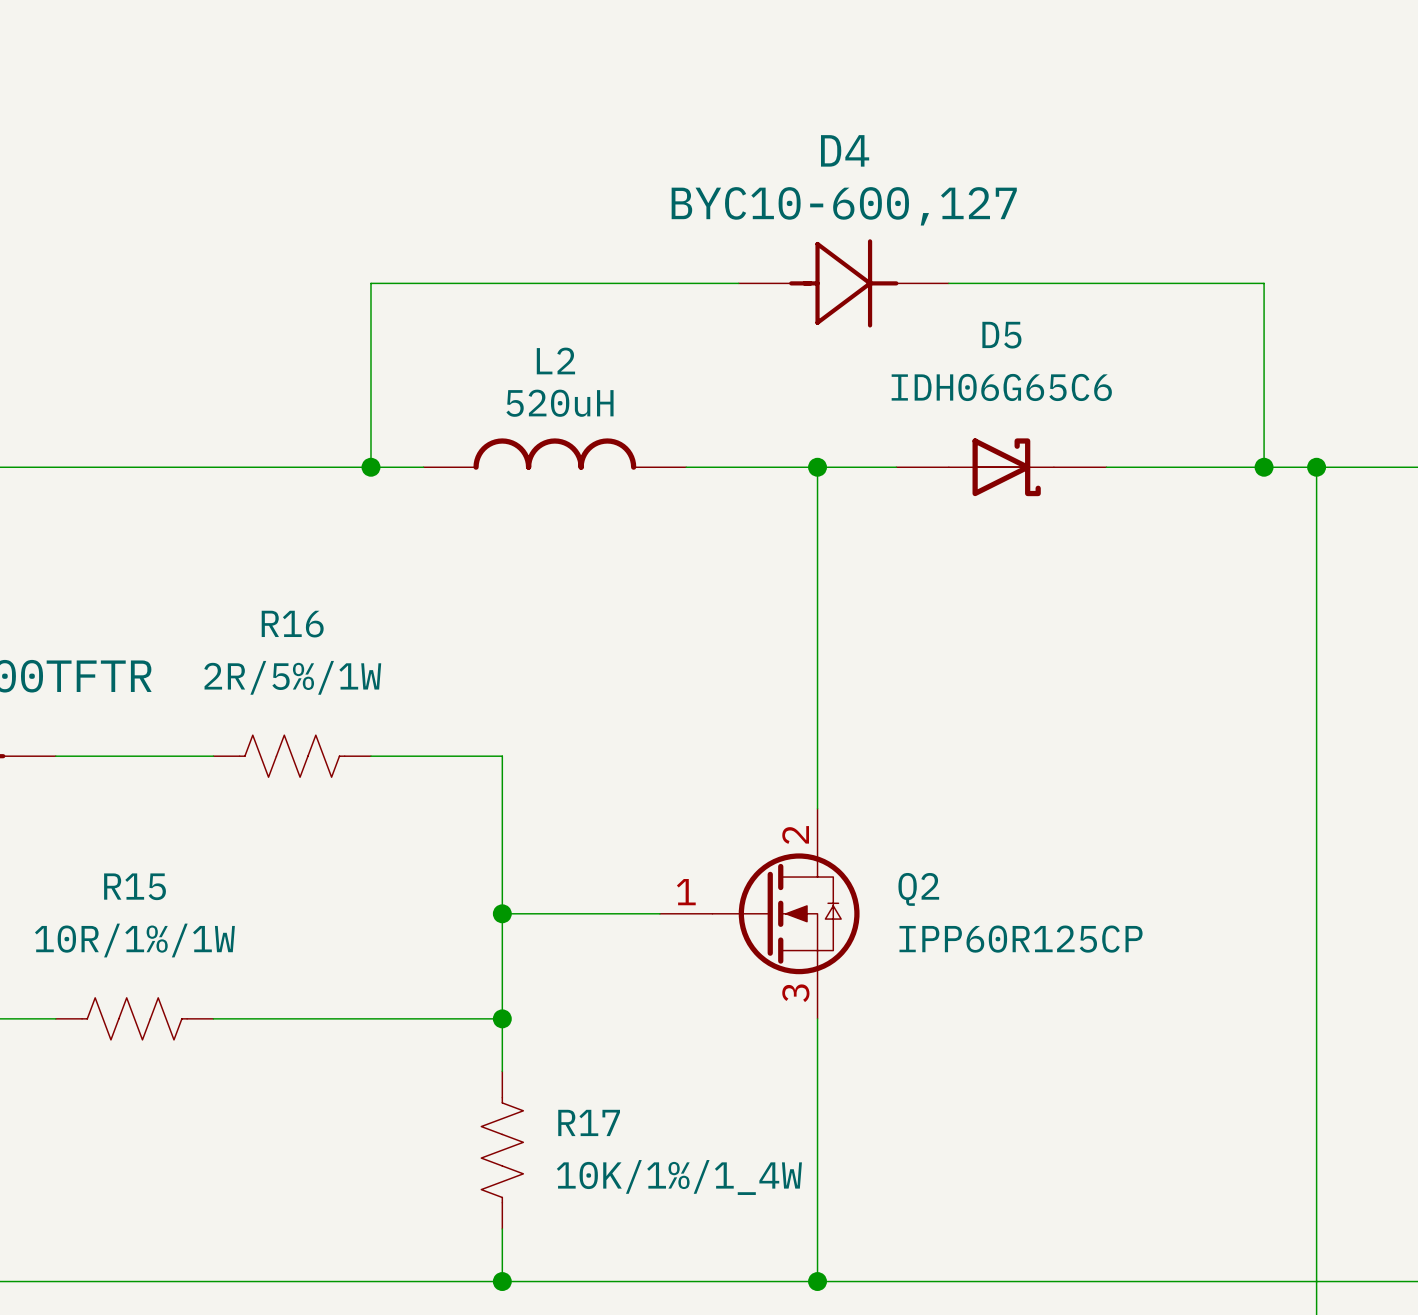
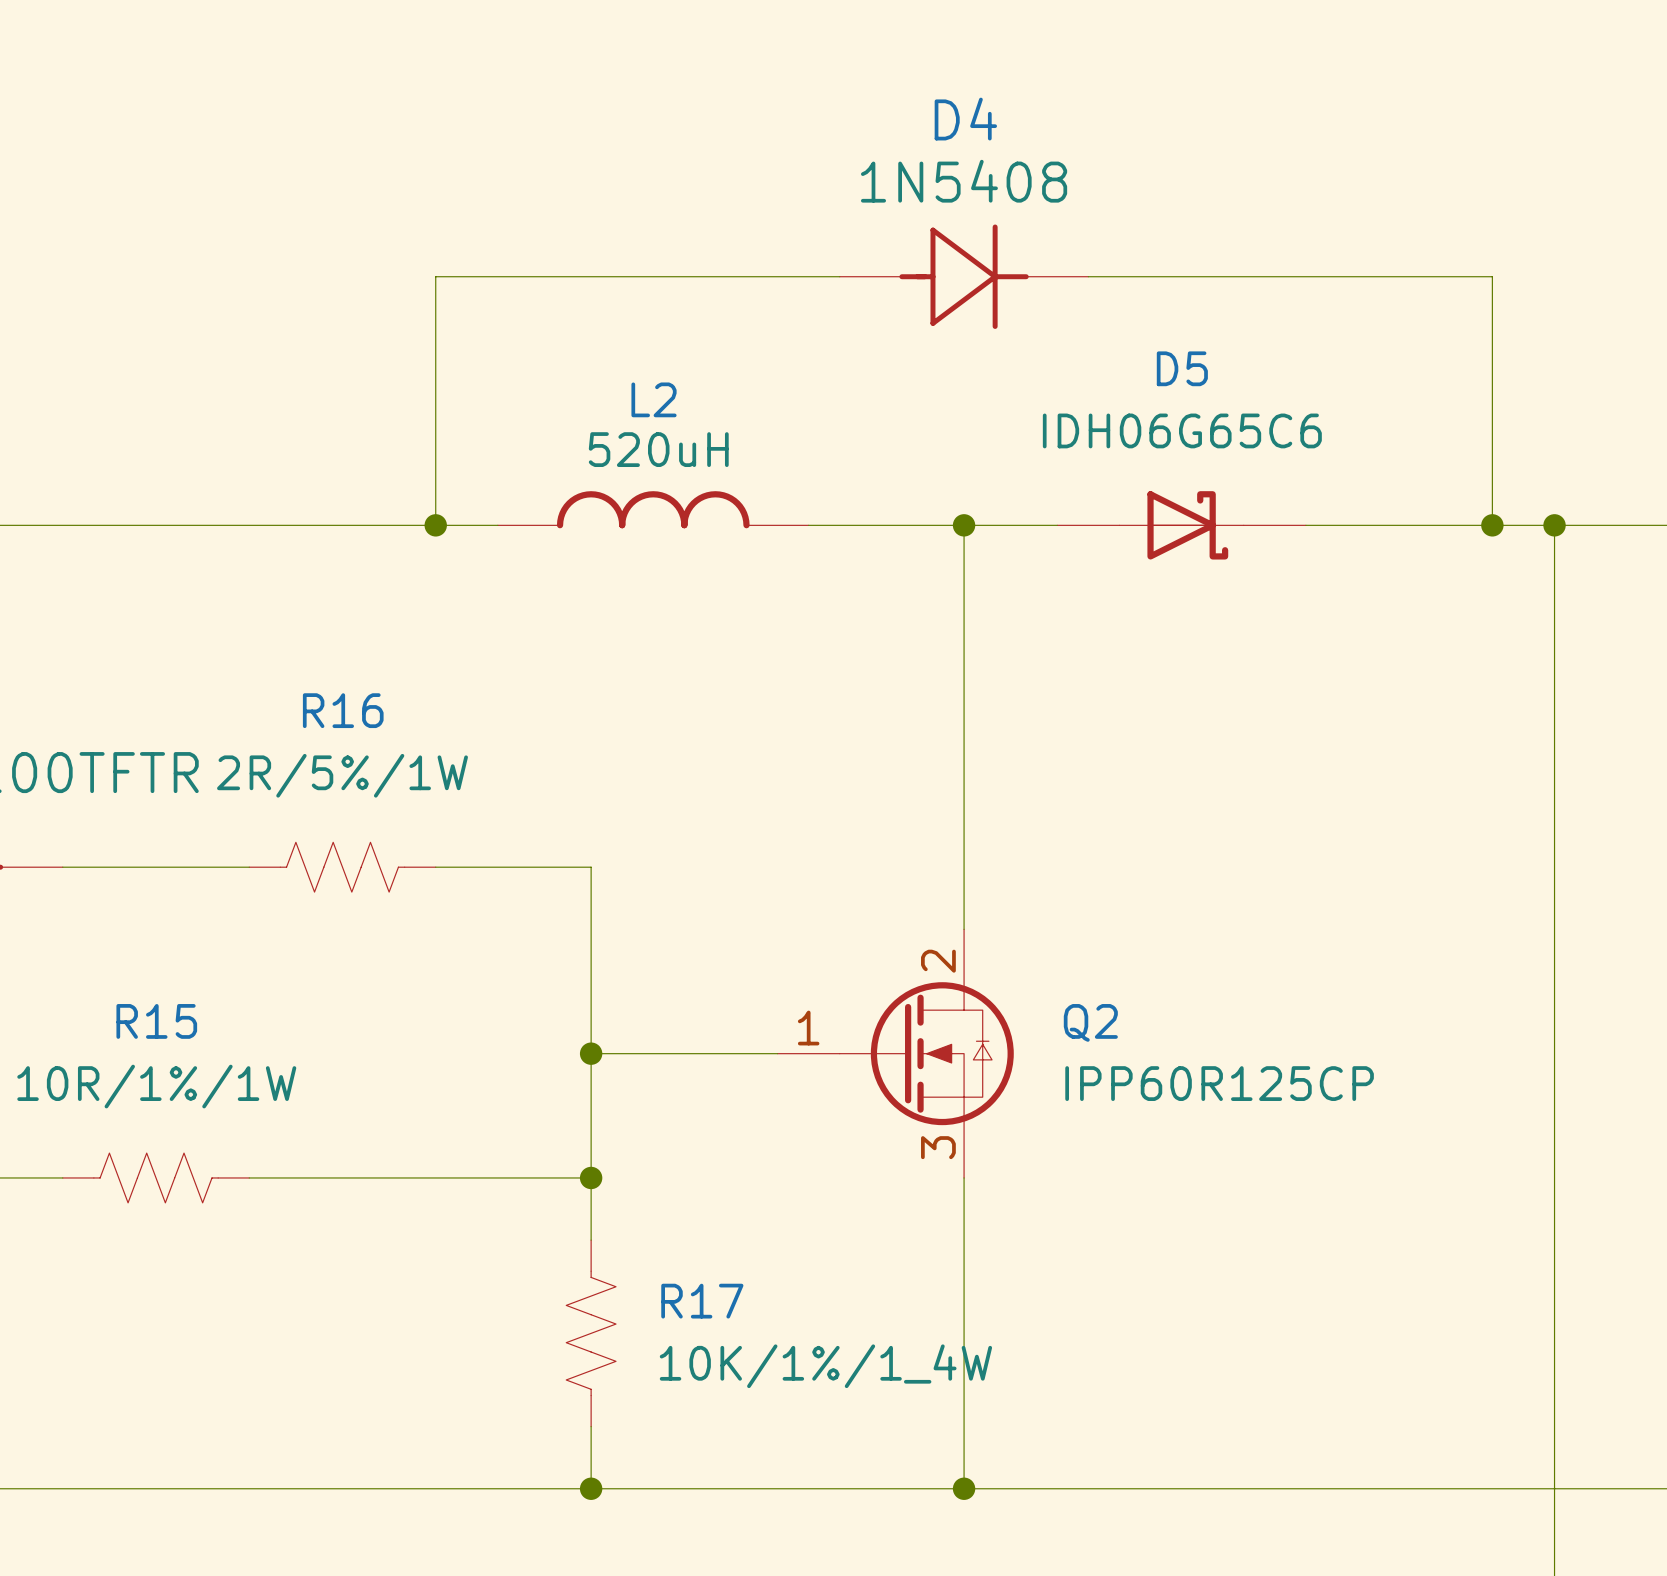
D4 value: BYC10-600,127 (844, 206) -> 1N5408 (964, 181)
wire: (370, 283) (738, 283) -> (435, 307) (435, 276) (839, 276)
D4 position: (843, 283) -> (964, 276)
wire: (948, 283) (1264, 283) -> (1088, 276) (1492, 276) (1492, 307)

